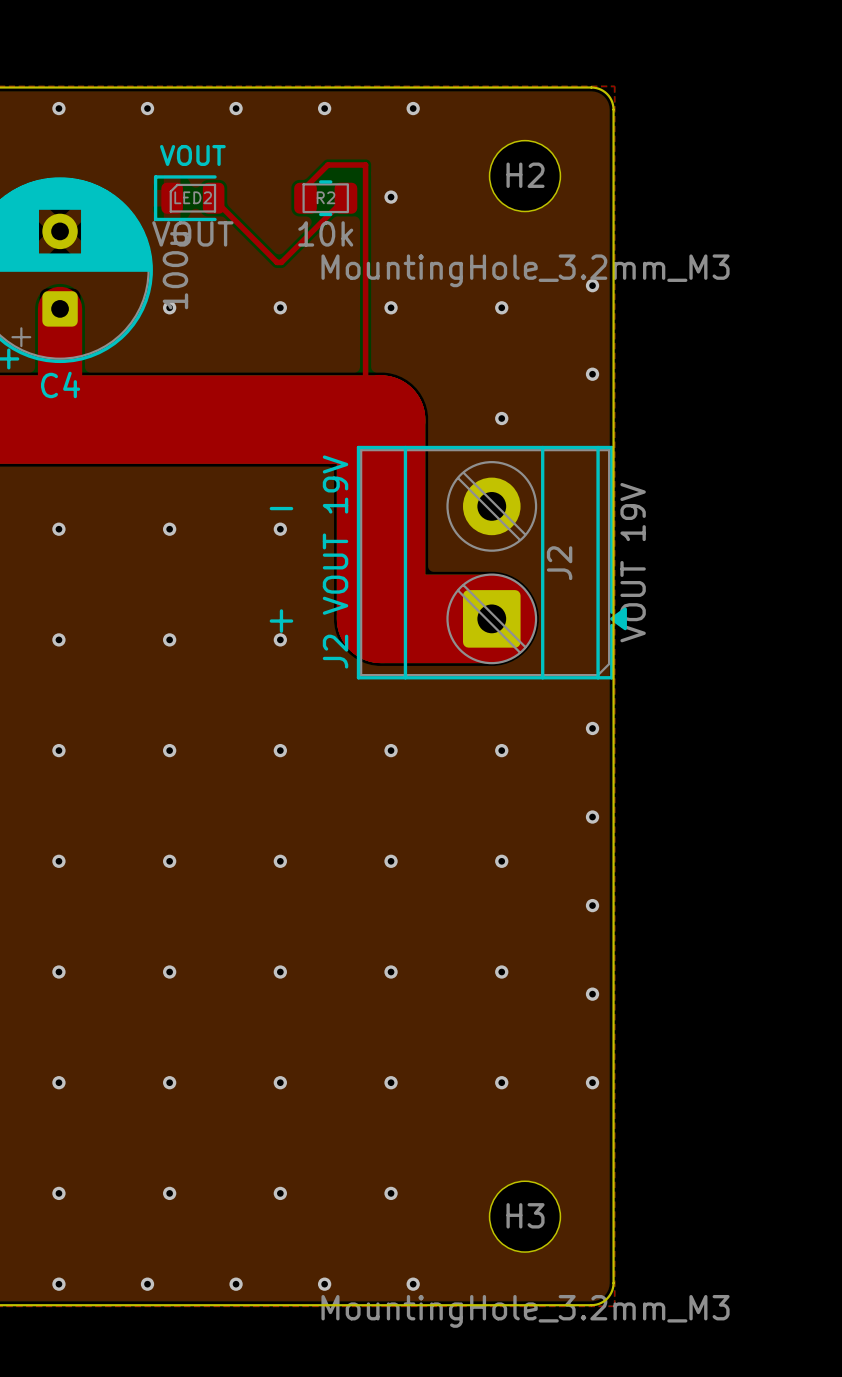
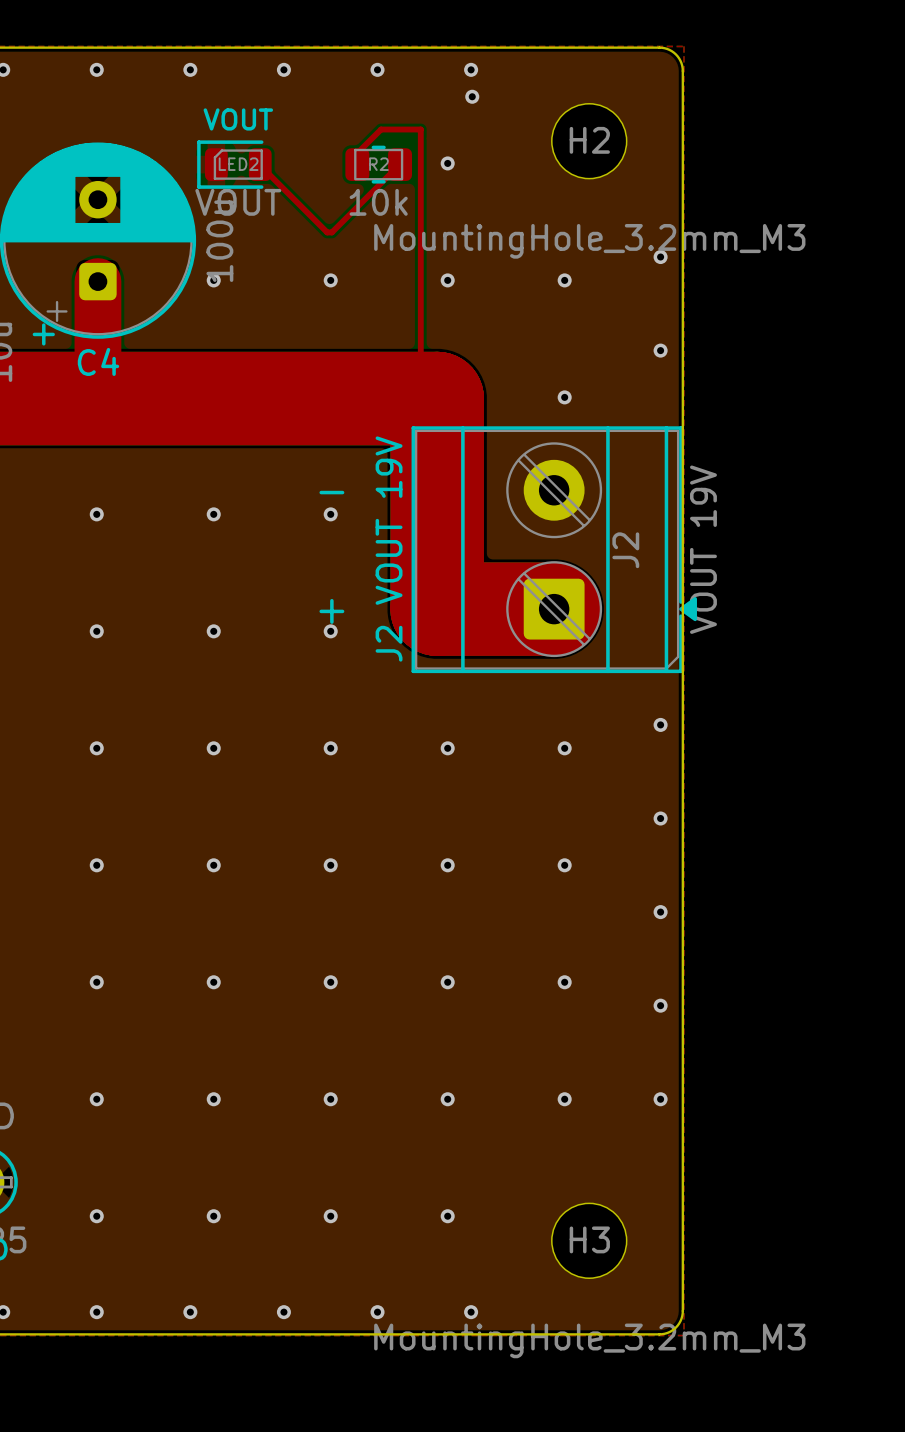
via: none -> (472, 96)

